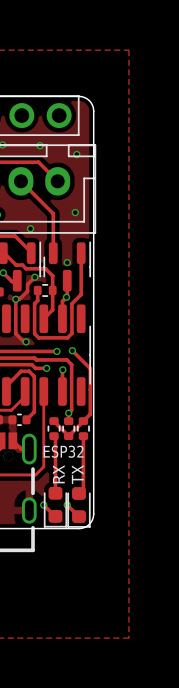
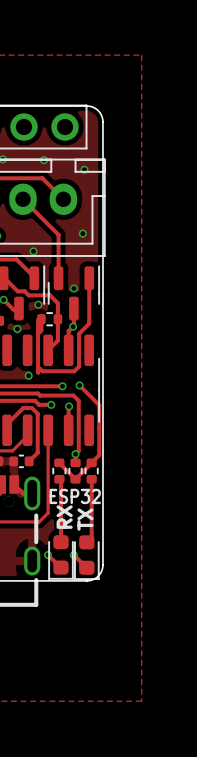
track: (34, 277) (27, 284) (27, 291) (19, 299) (15, 299) (15, 333) (26, 341) -> none

